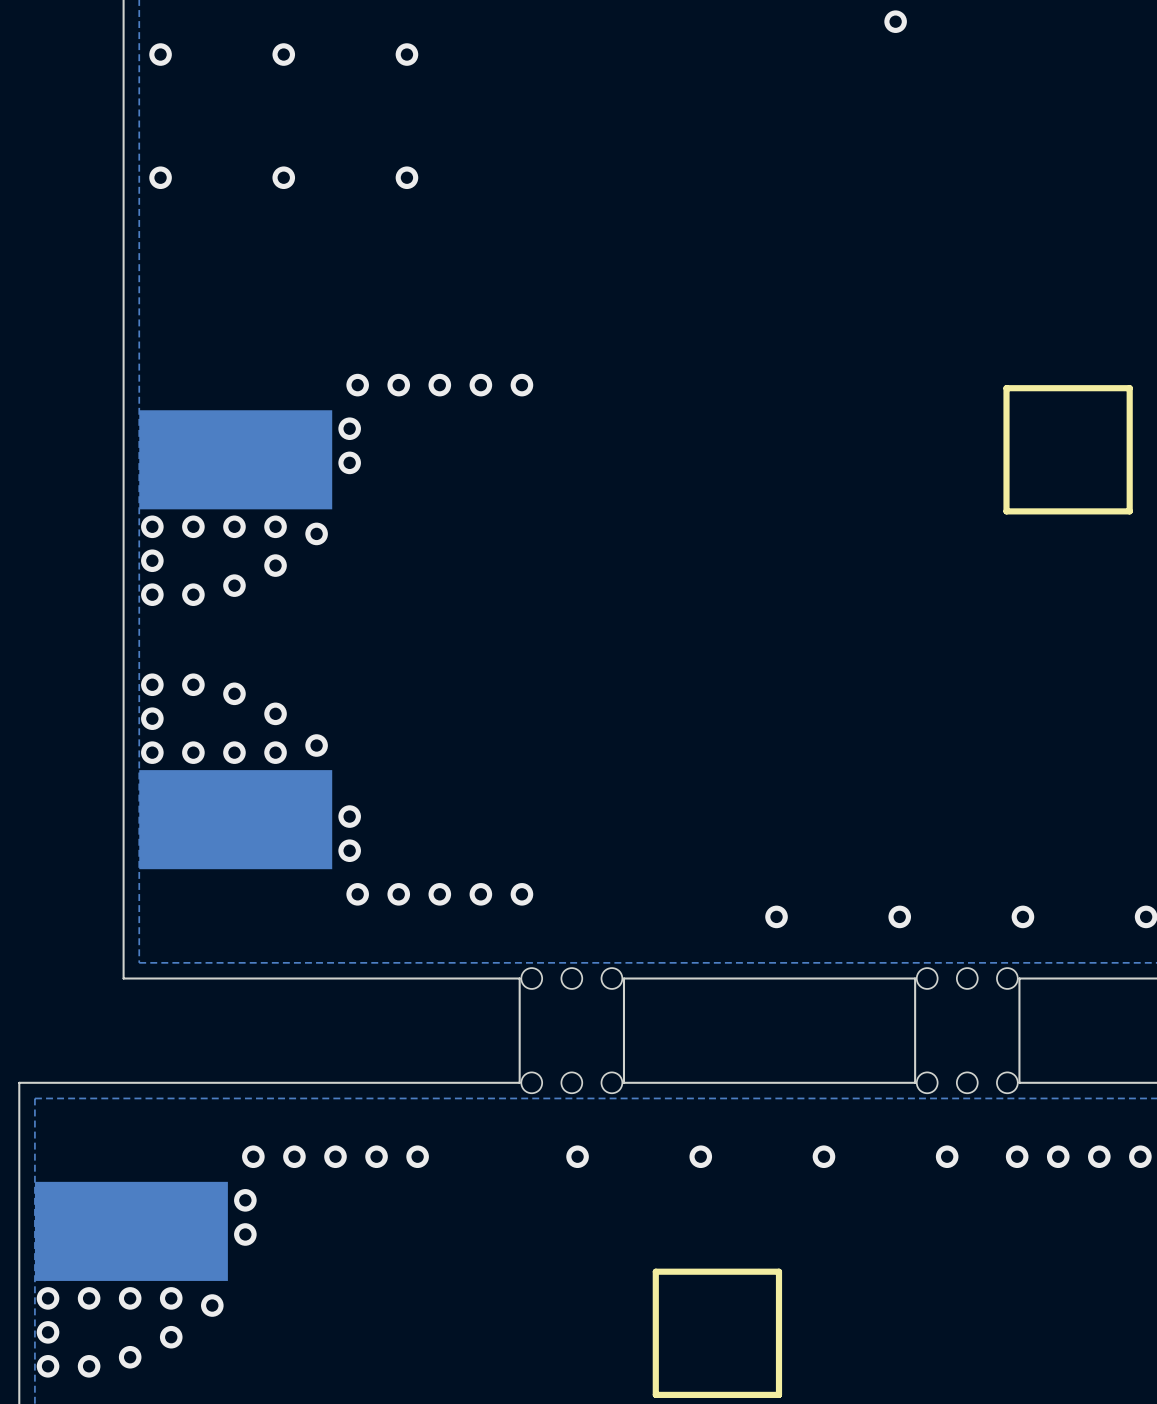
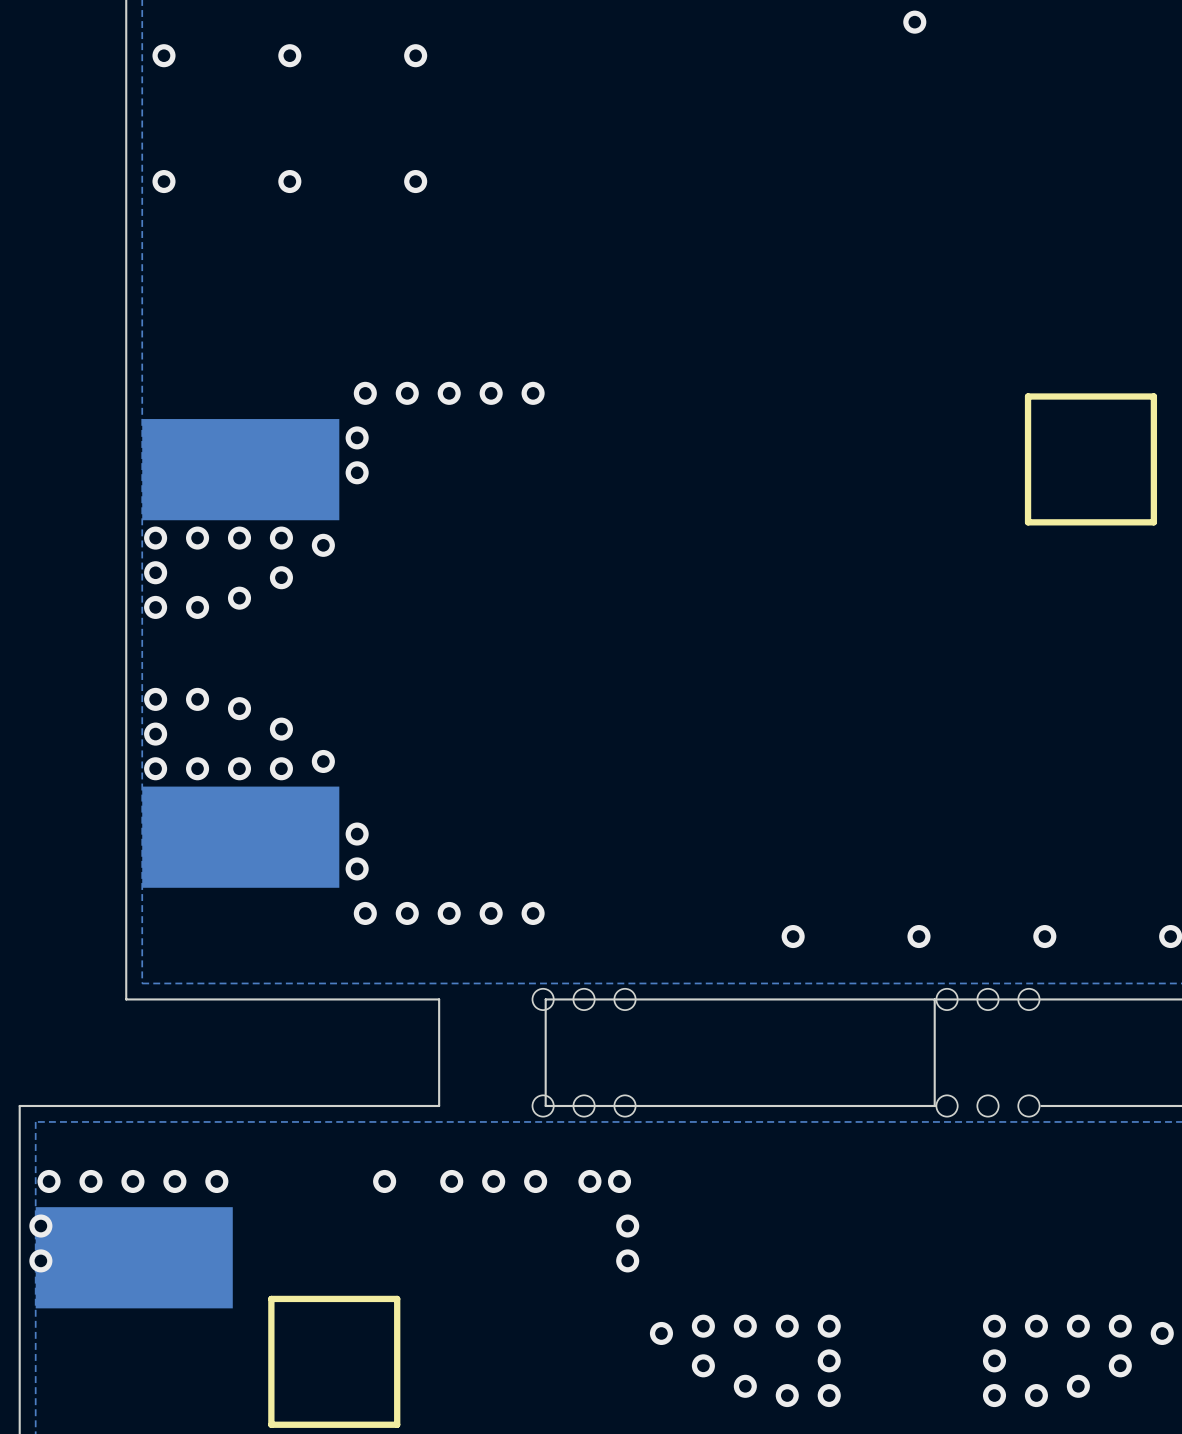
board edge: (429, 978) (519, 978) (519, 1082) (429, 1082) -> (439, 999) (439, 1105)
board edge: (623, 978) (623, 1082) -> (637, 999) (545, 999) (545, 1105) (637, 1105)
board edge: (1019, 978) (1019, 1082) -> (1041, 999) (934, 999)
via: none -> (49, 1181)
via: none -> (91, 1181)
via: none -> (132, 1181)
via: none -> (174, 1181)
via: none -> (216, 1181)
via: (253, 1156) -> none
via: (294, 1156) -> none
via: (335, 1156) -> none
via position: (417, 1156) -> (451, 1181)
via: none -> (493, 1181)
via: none -> (535, 1181)
via: none -> (619, 1181)
via: (700, 1156) -> none
via: (823, 1156) -> none
via: (947, 1156) -> none
via: (1017, 1156) -> none
via: (1058, 1156) -> none
via: (1099, 1156) -> none
via: (1140, 1156) -> none
via: none -> (40, 1226)
via: (245, 1200) -> none
via: none -> (627, 1226)
via: none -> (40, 1260)
via: (245, 1234) -> none
via: none -> (627, 1260)
line: (779, 1271) (655, 1271) (655, 1394) (779, 1394) (779, 1271) -> (397, 1298) (271, 1298) (271, 1424) (397, 1424) (397, 1298)
via: (48, 1298) -> none
via: (89, 1298) -> none
via: (130, 1298) -> none
via: (171, 1298) -> none
via: none -> (703, 1326)
via: none -> (745, 1326)
via: none -> (787, 1326)
via: none -> (829, 1326)
via: none -> (994, 1326)
via: none -> (1036, 1326)
via: none -> (1078, 1326)
via: none -> (1120, 1326)
via: (212, 1305) -> none
via: none -> (661, 1333)
via: none -> (1162, 1333)
via: (48, 1332) -> none
via: none -> (829, 1360)
via: none -> (994, 1360)
via: (171, 1337) -> none
via: none -> (703, 1365)
via: none -> (1120, 1365)
via: (130, 1357) -> none
via: none -> (745, 1386)
via: none -> (1078, 1386)
via: (48, 1366) -> none
via: (89, 1366) -> none
via: none -> (787, 1395)
via: none -> (829, 1395)
via: none -> (994, 1395)
via: none -> (1036, 1395)

